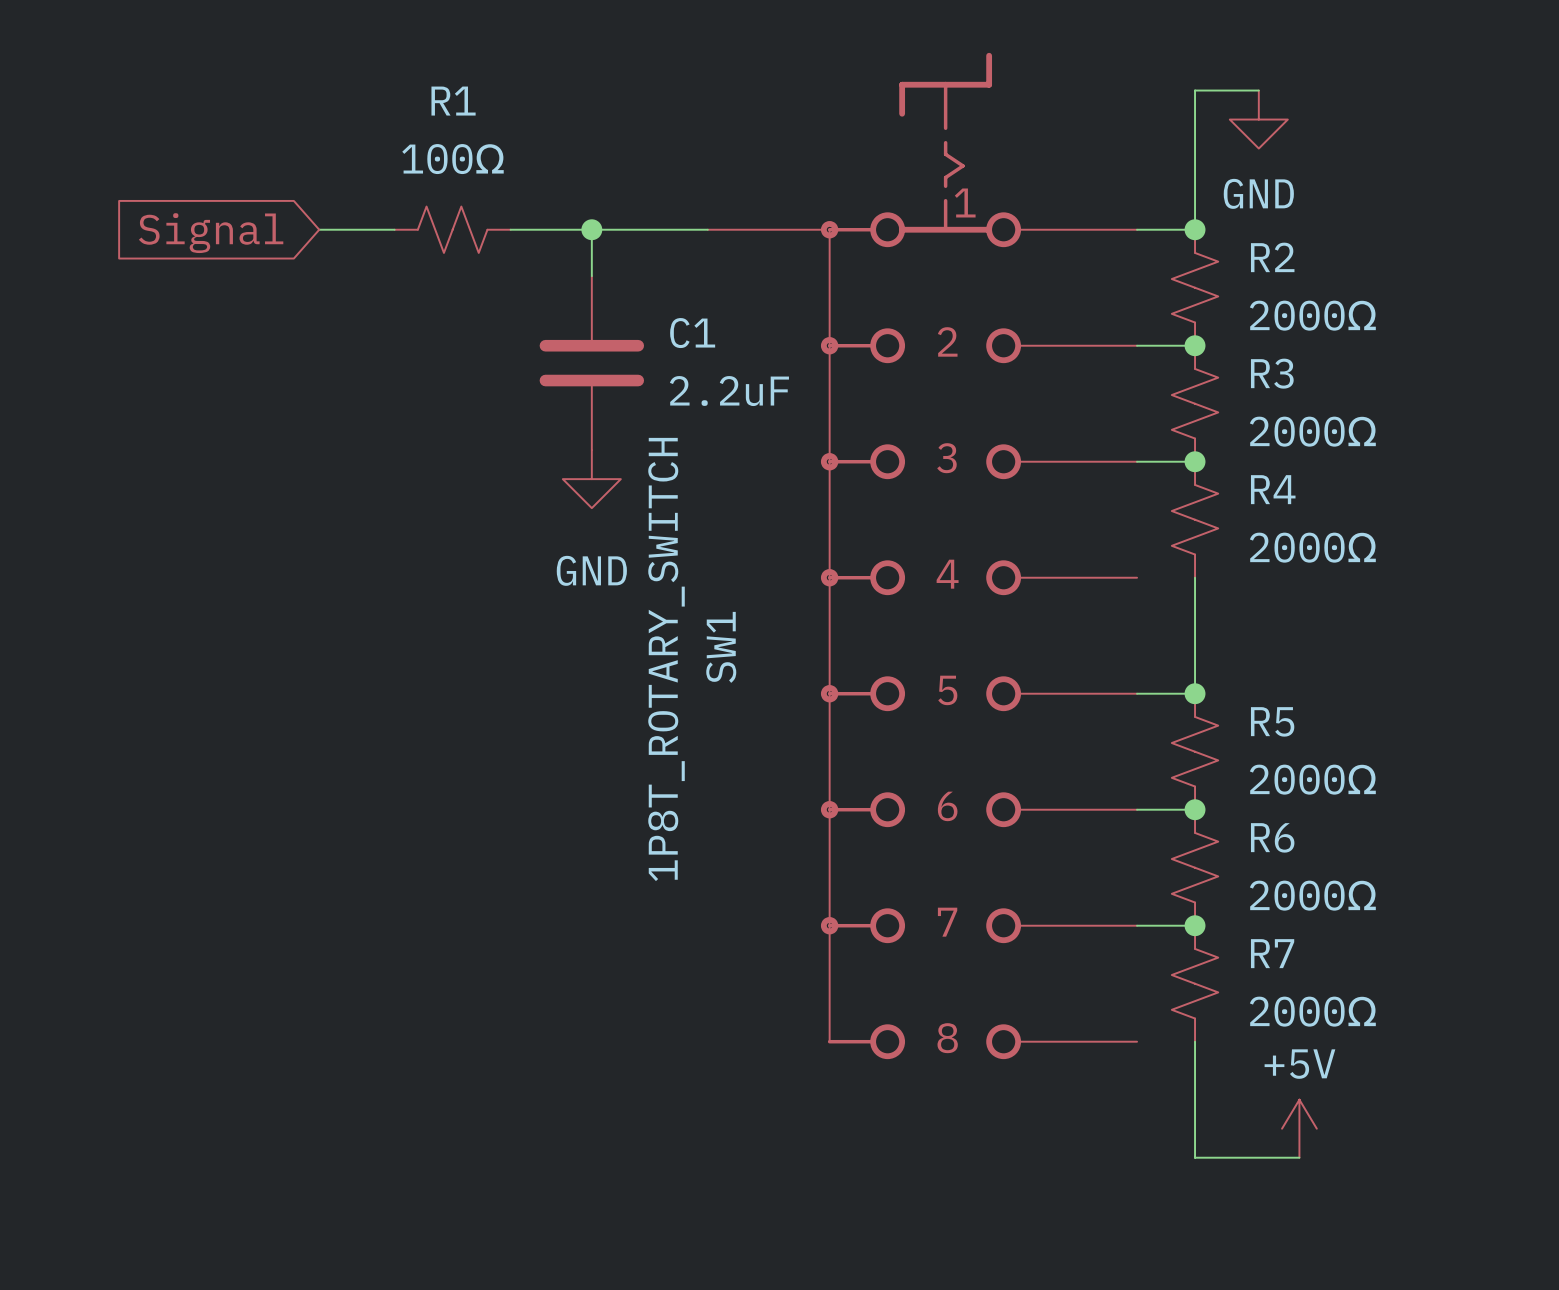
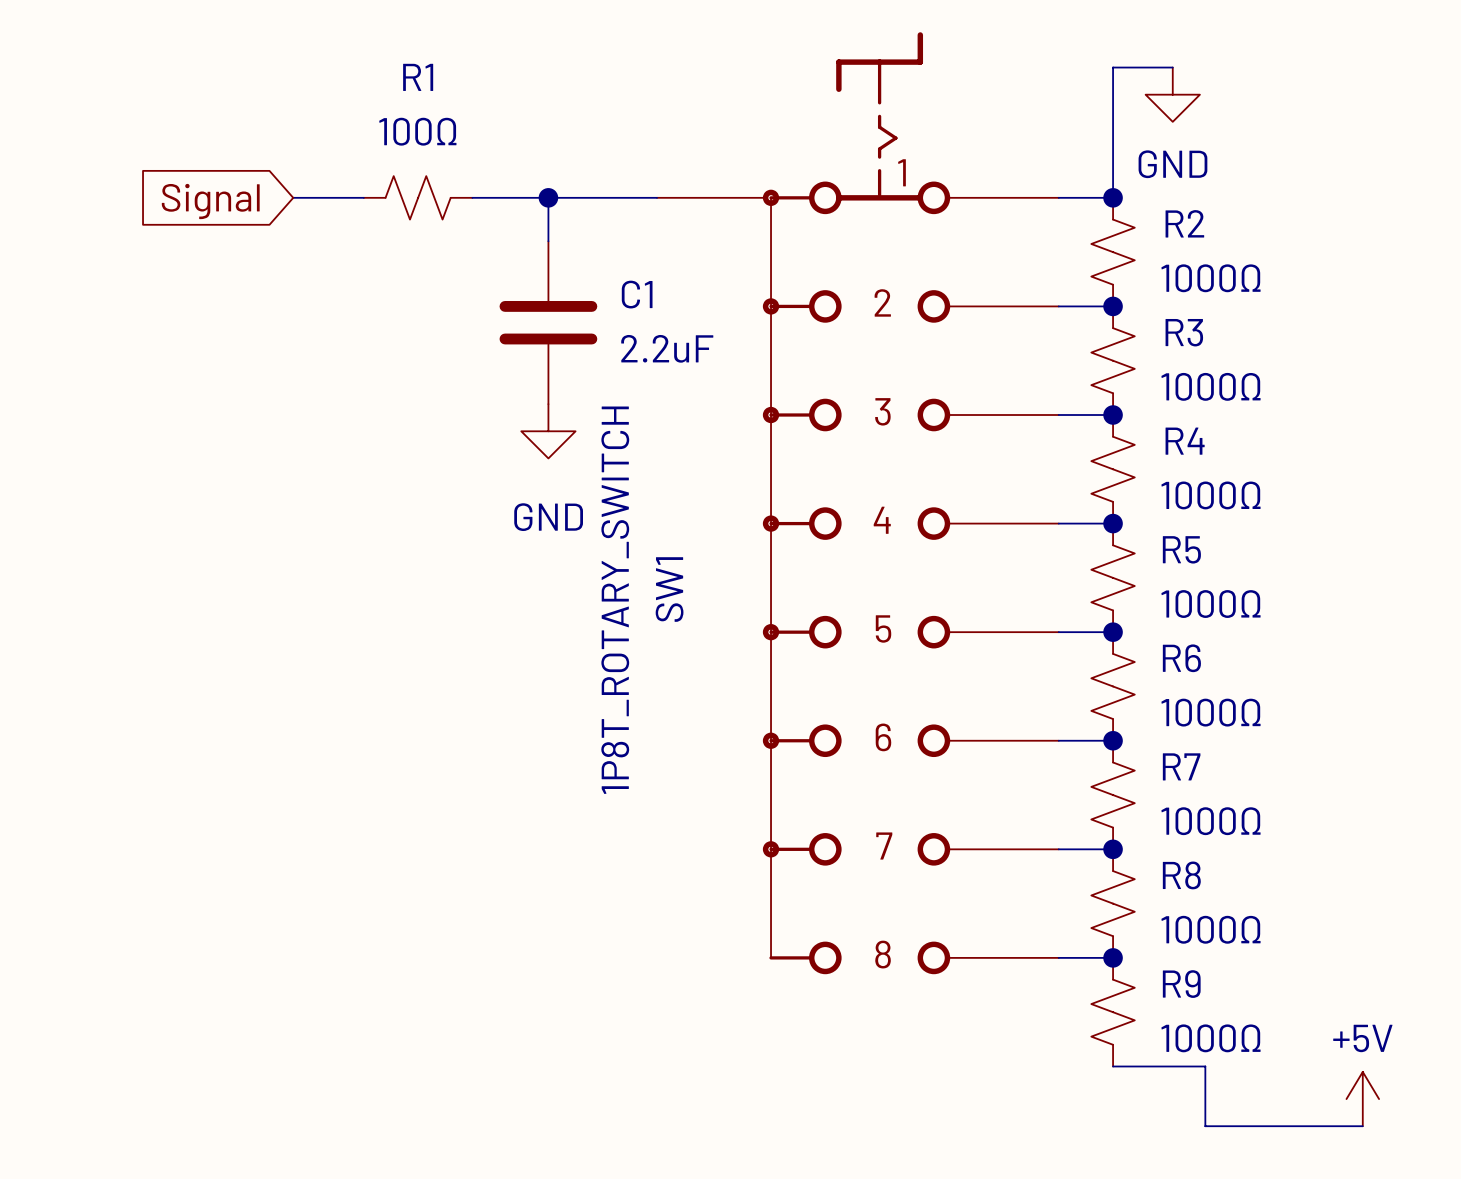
R2 value: 2000Ω (1312, 315) -> 1000Ω (1211, 278)
R3 value: 2000Ω (1312, 431) -> 1000Ω (1211, 386)
R4 value: 2000Ω (1312, 547) -> 1000Ω (1211, 495)
wire: (1195, 577) (1195, 693) -> (1113, 523) (1058, 523)
junction: none -> (1113, 523)
R5: none -> 1000Ω (1113, 577)
R5 name: R5 (1272, 721) -> R6 (1181, 658)
R5 value: 2000Ω (1312, 779) -> 1000Ω (1211, 712)
R6 name: R6 (1272, 837) -> R7 (1181, 766)
R6 value: 2000Ω (1312, 895) -> 1000Ω (1211, 821)
R7 name: R7 (1272, 953) -> R8 (1181, 875)
R7 value: 2000Ω (1312, 1011) -> 1000Ω (1211, 929)
wire: (1195, 1041) (1195, 1157) -> (1113, 957) (1058, 957)
junction: none -> (1113, 957)
R9: none -> 1000Ω (1113, 1012)
power symbol position: +5V (1299, 1128) -> +5V (1362, 1099)
wire: (1293, 1157) (1299, 1157) -> (1205, 1066) (1205, 1126) (1362, 1126)

